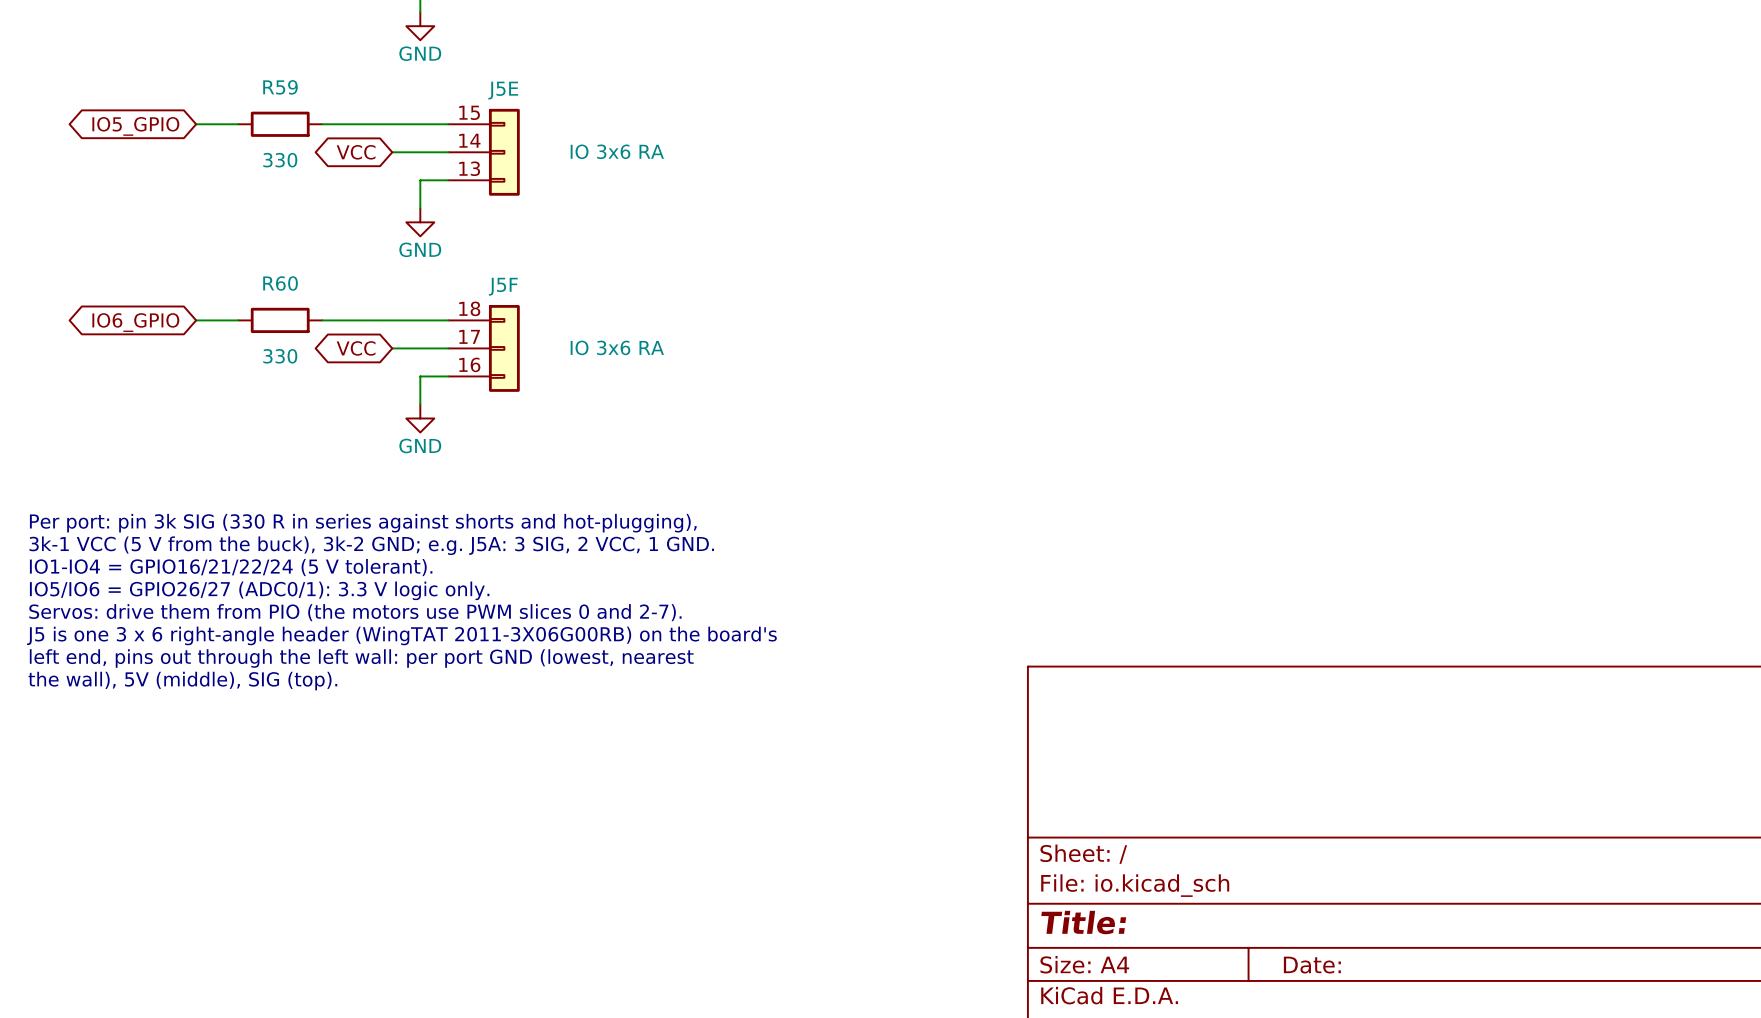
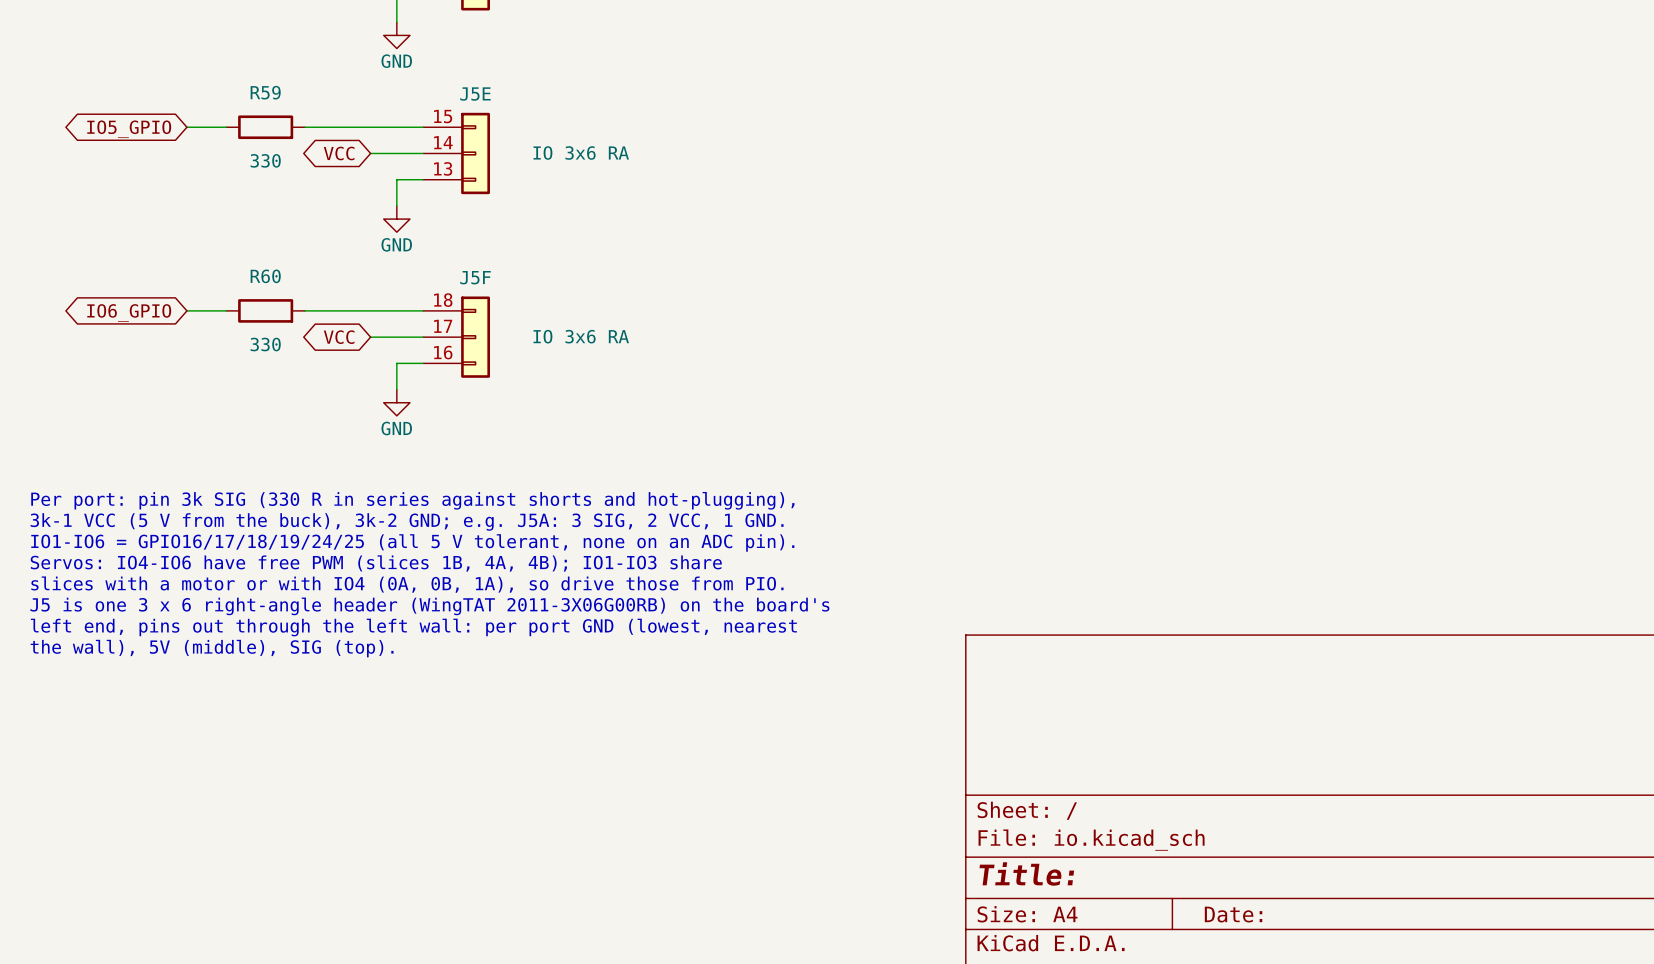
text: IO1-IO4 = GPIO16/21/22/24 (5 V tolerant). (231, 567) -> IO1-IO6 = GPIO16/17/18/19/24/25 (all 5 V tolerant, none on an ADC pin). (412, 542)
text: IO5/IO6 = GPIO26/27 (ADC0/1): 3.3 V logic only. (259, 590) -> Servos: IO4-IO6 have free PWM (slices 1B, 4A, 4B); IO1-IO3 share (376, 563)
text: Servos: drive them from PIO (the motors use PWM slices 0 and 2-7). (355, 612) -> slices with a motor or with IO4 (0A, 0B, 1A), so drive those from PIO. (407, 584)

